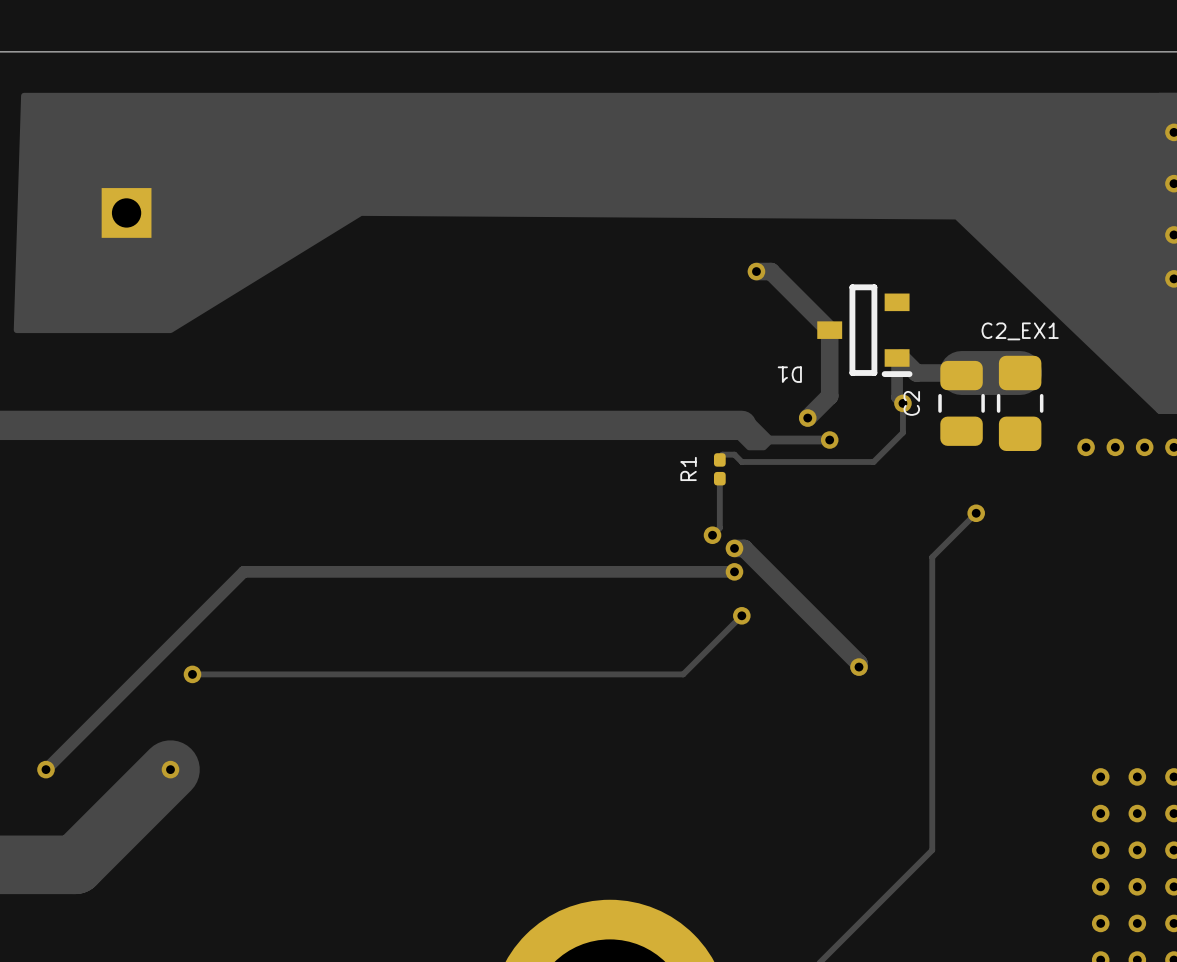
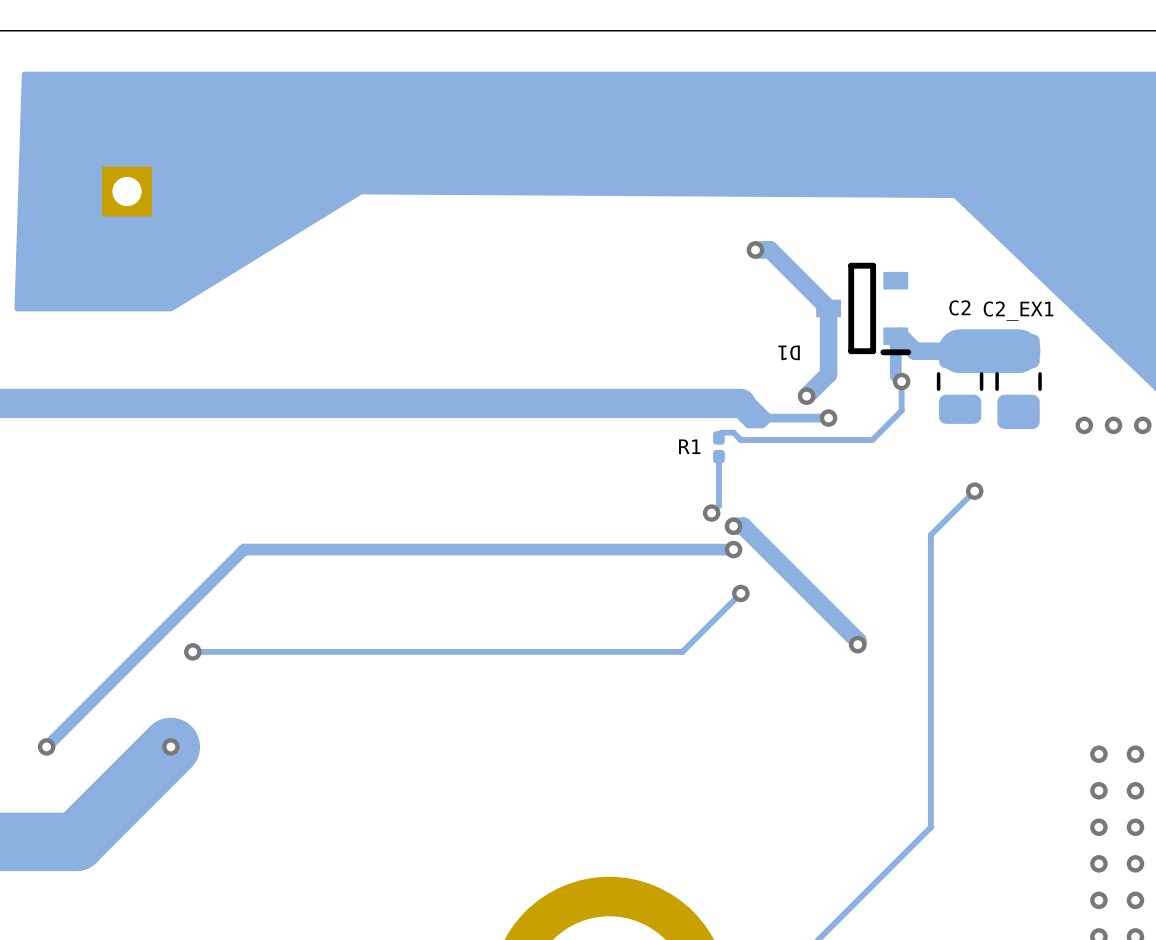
C2 name rotation: 0° (911, 403) -> 90° clockwise (959, 307)
C2 name position: C2 (911, 403) -> C2 (959, 307)
R1 name rotation: 0° (688, 468) -> 90° clockwise (689, 446)

